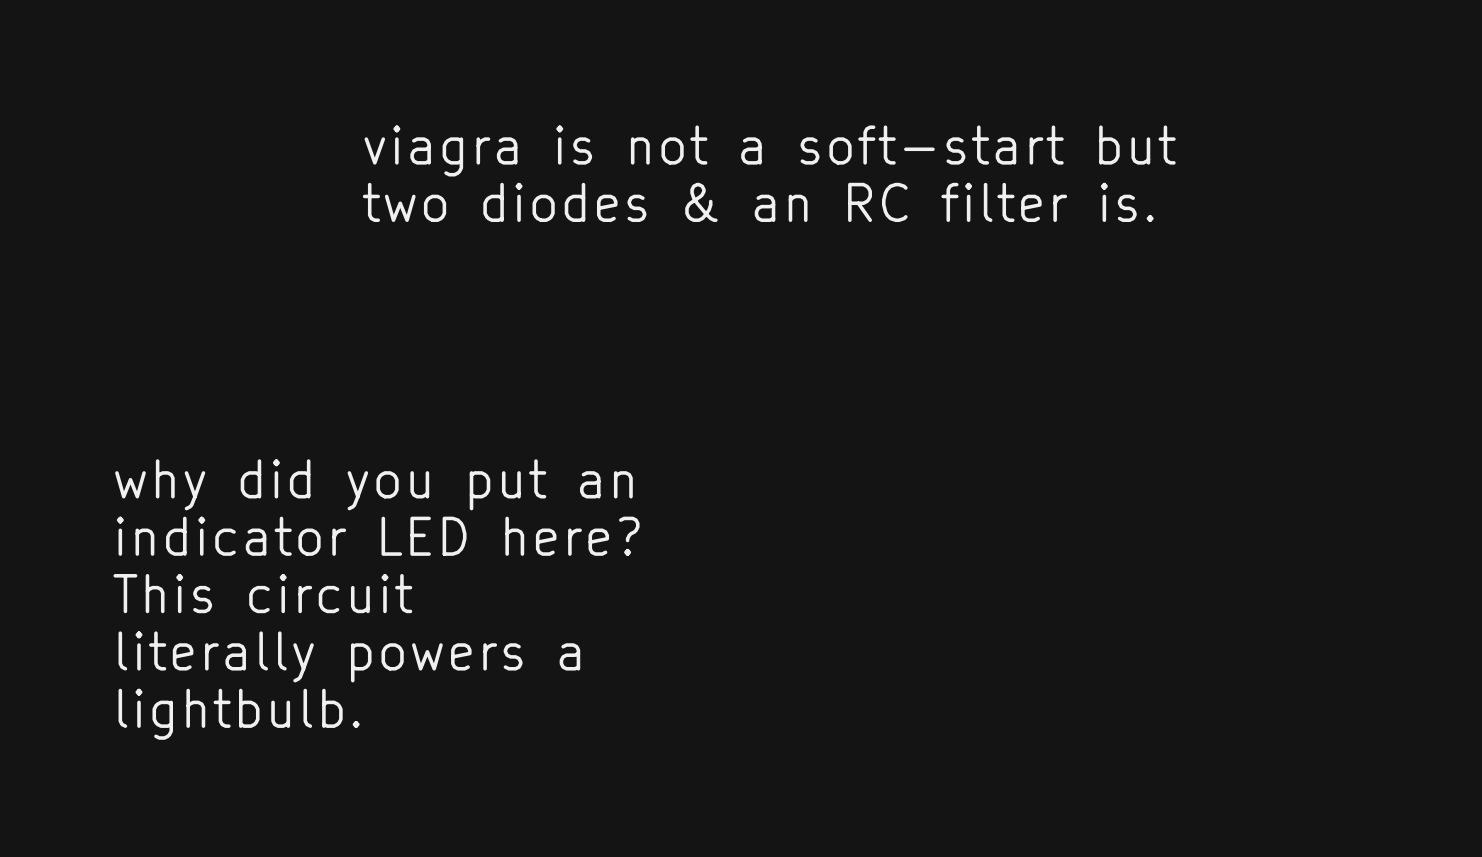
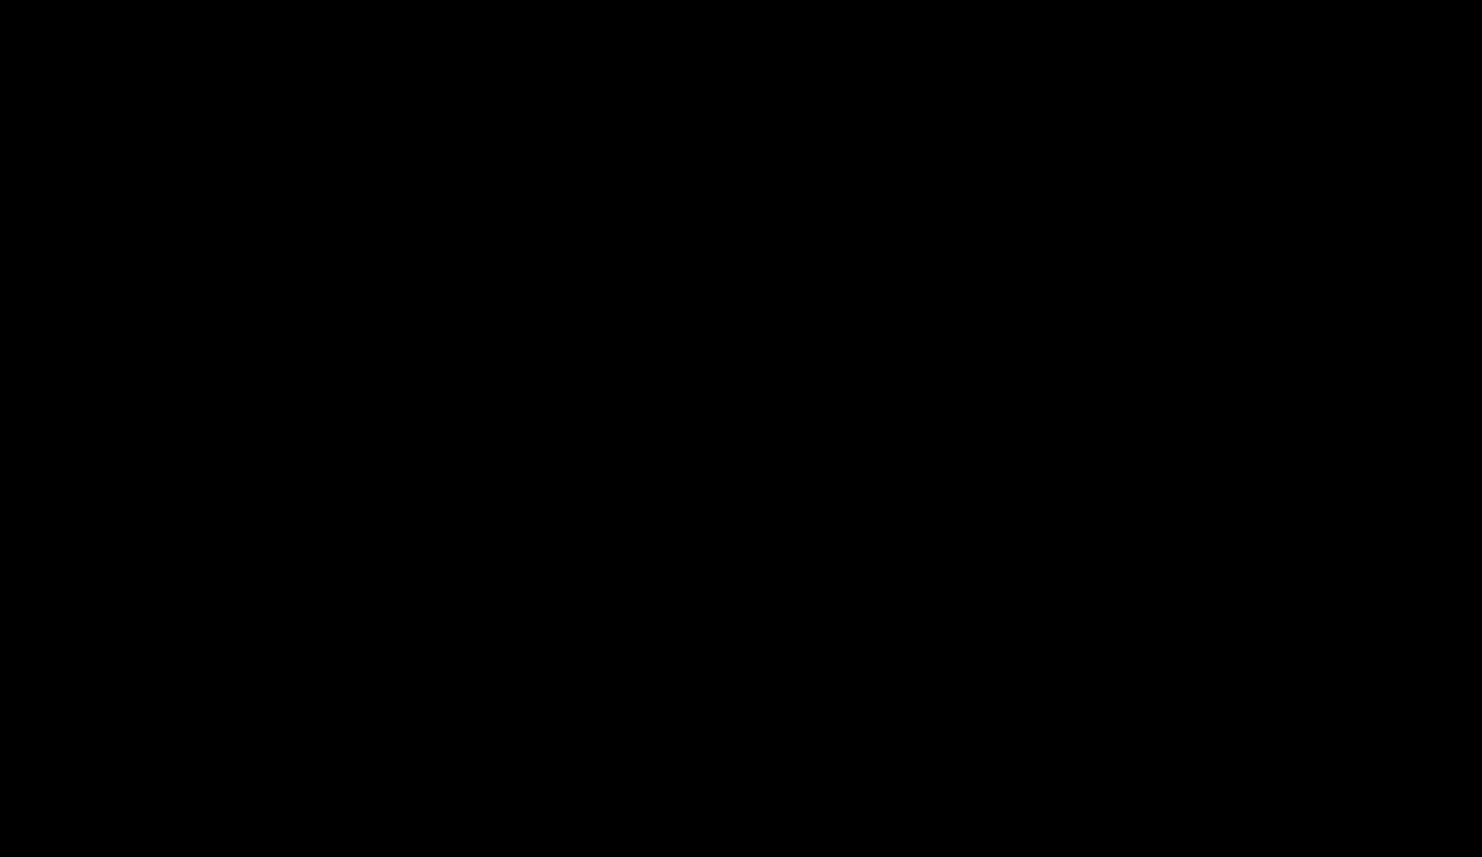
text: viagra is not a soft-start but (770, 150) -> none
text: two diodes & an RC filter is. (758, 202) -> none
text: why did you put an (373, 484) -> none
text: indicator LED here? (378, 536) -> none
text: This circuit (262, 593) -> none
text: literally powers a (349, 656) -> none
text: lightbulb. (239, 714) -> none

